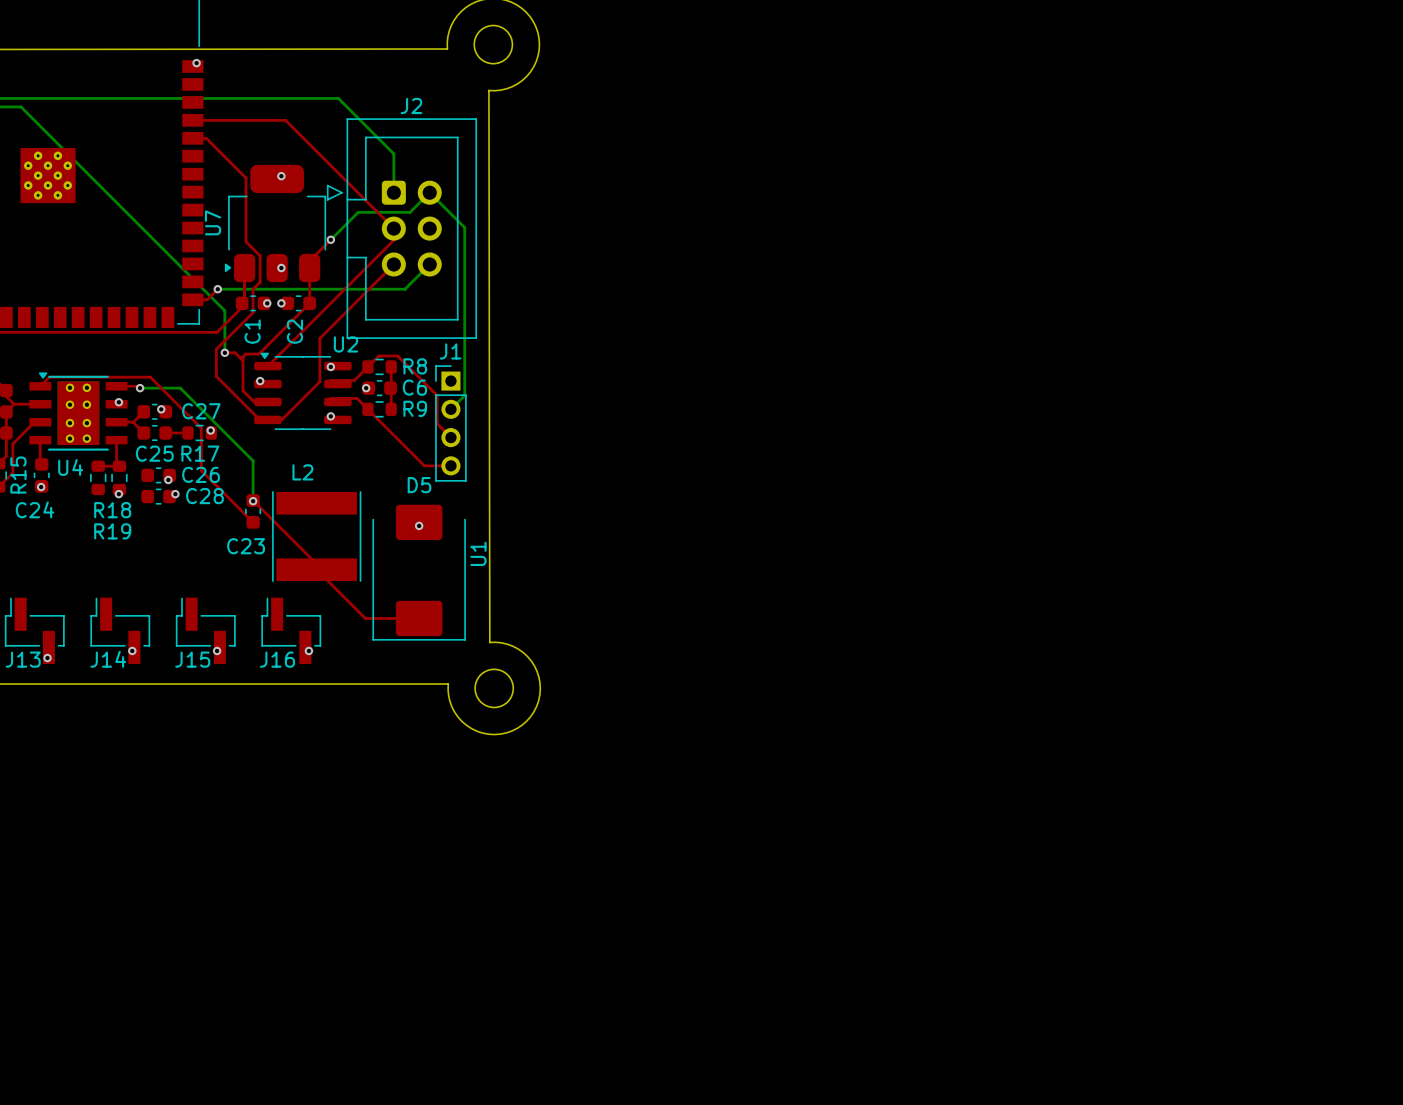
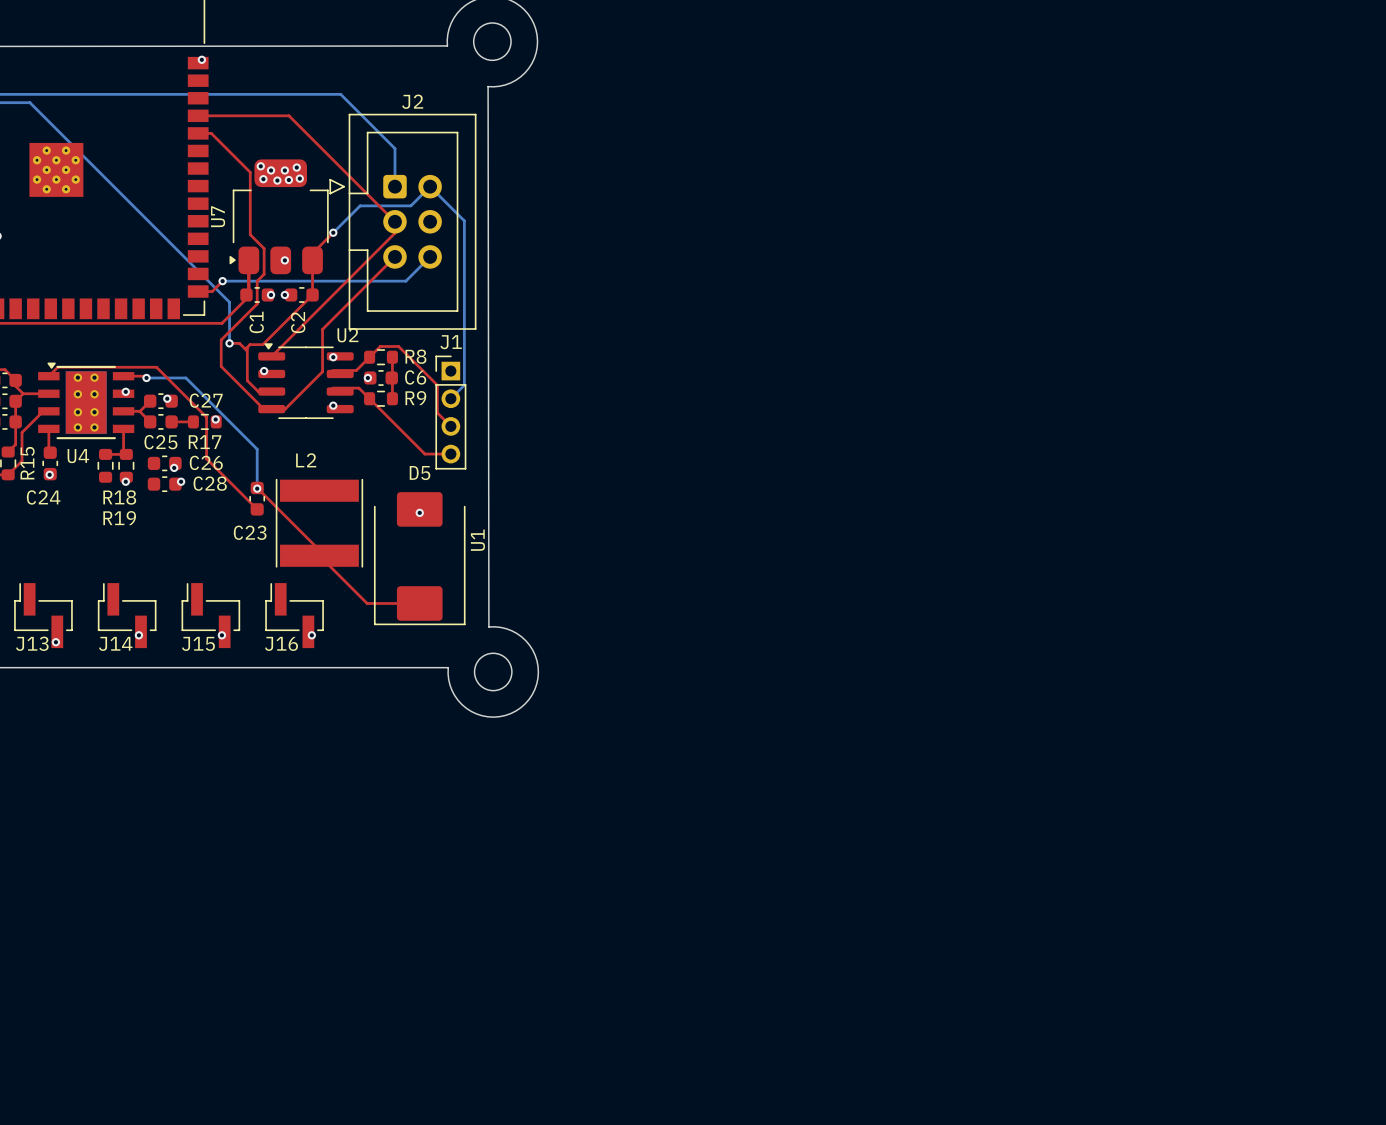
via: none -> (260, 166)
via: none -> (296, 167)
via: none -> (271, 170)
via: none -> (299, 178)
via: none -> (263, 179)
via: none -> (288, 180)
via: none -> (277, 180)

